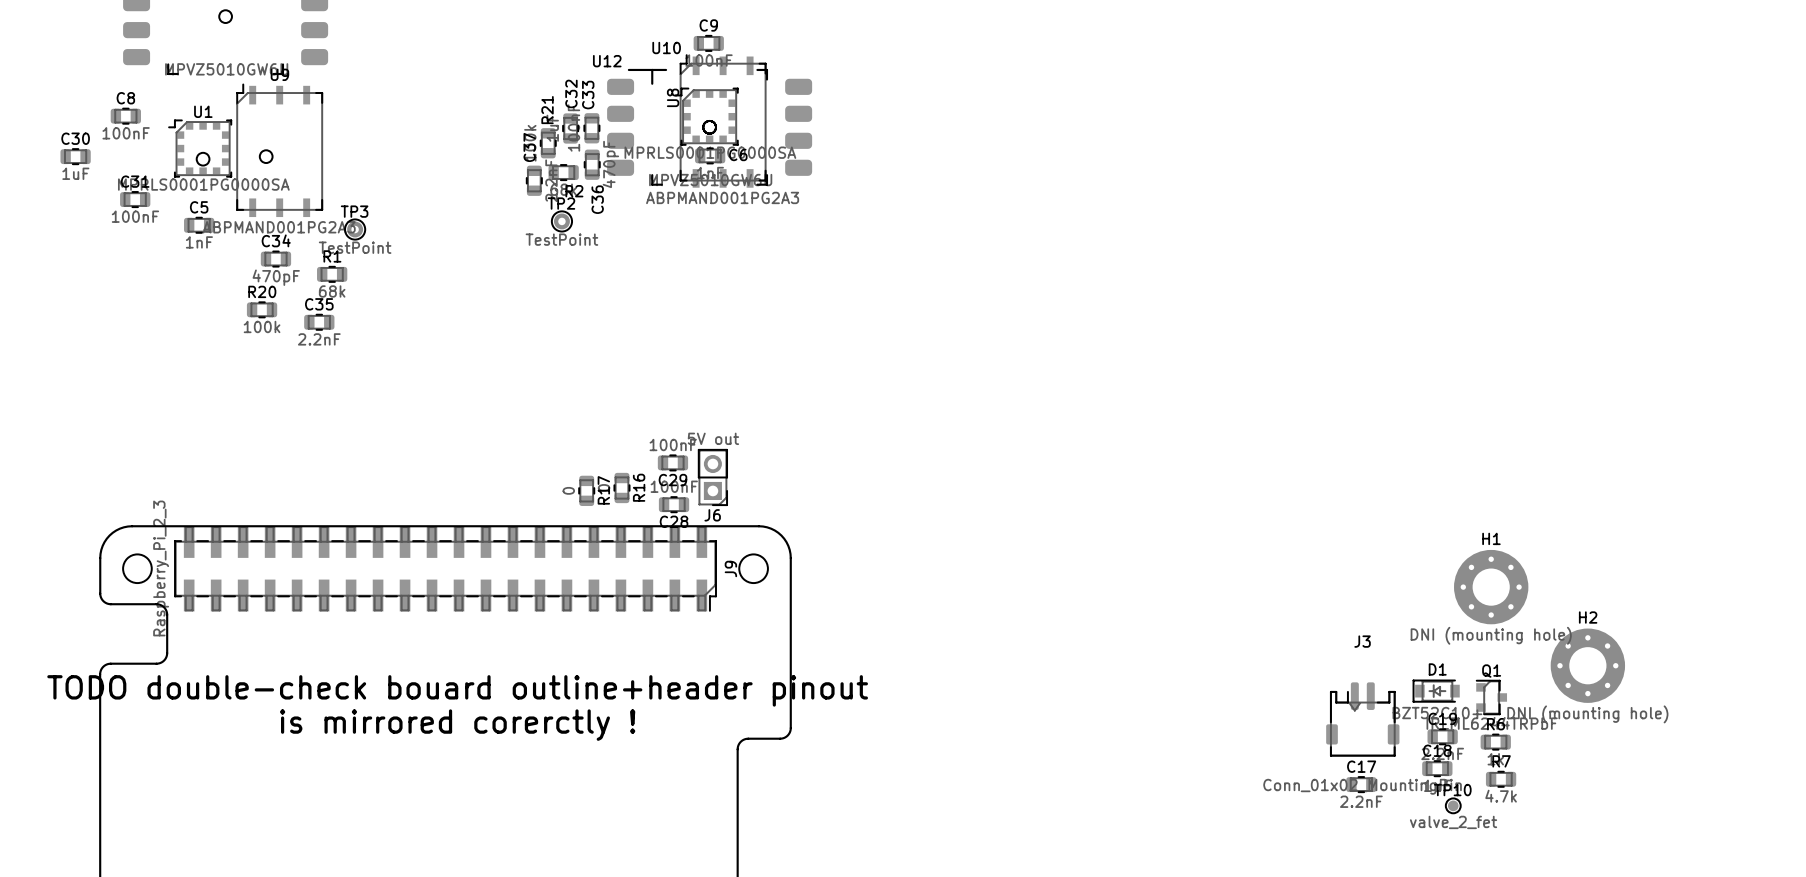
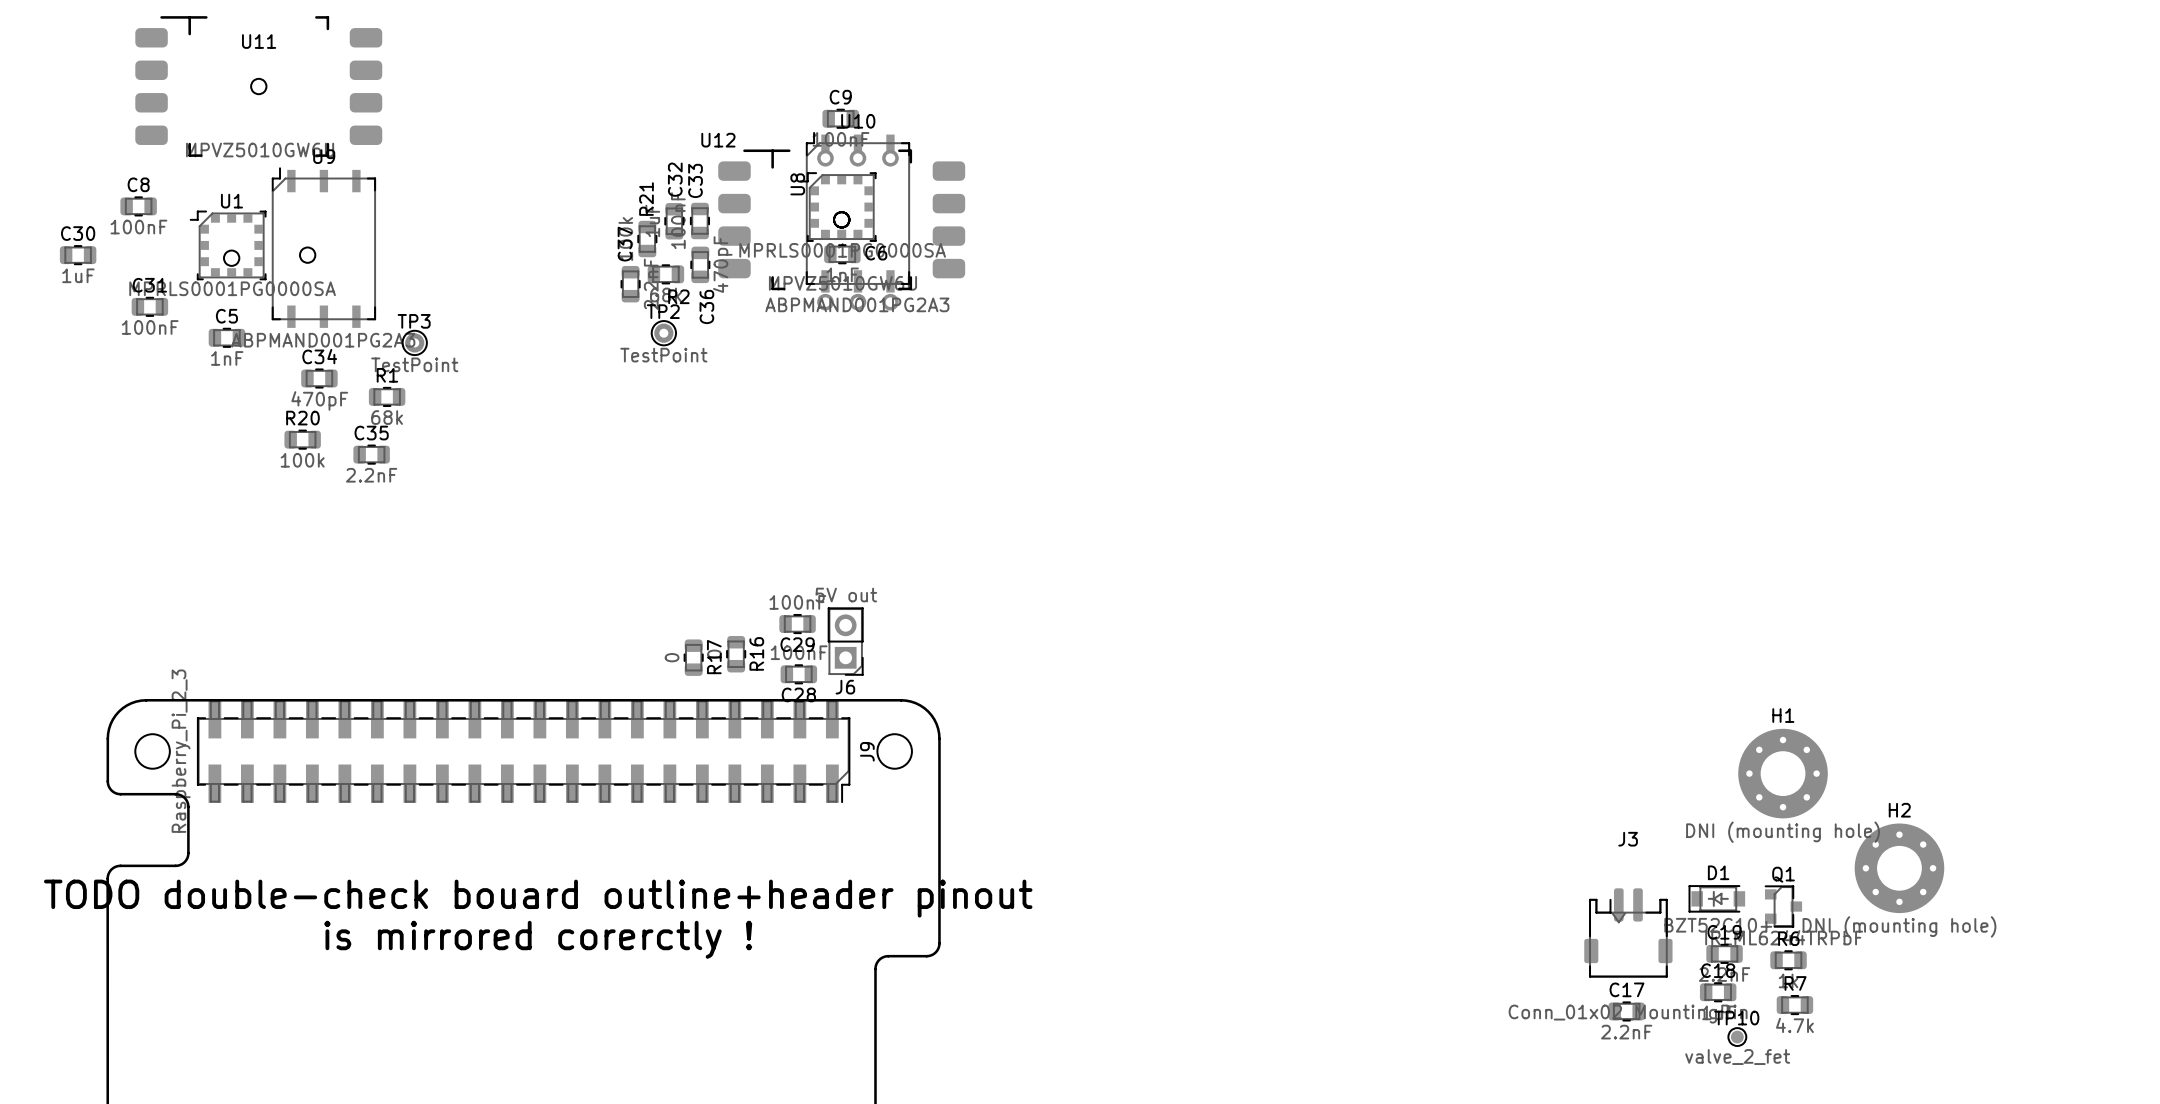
U10 name position: U10 (666, 47) -> U10 (858, 121)
U10 footprint: [679, 54, 767, 188] -> [806, 132, 910, 311]

